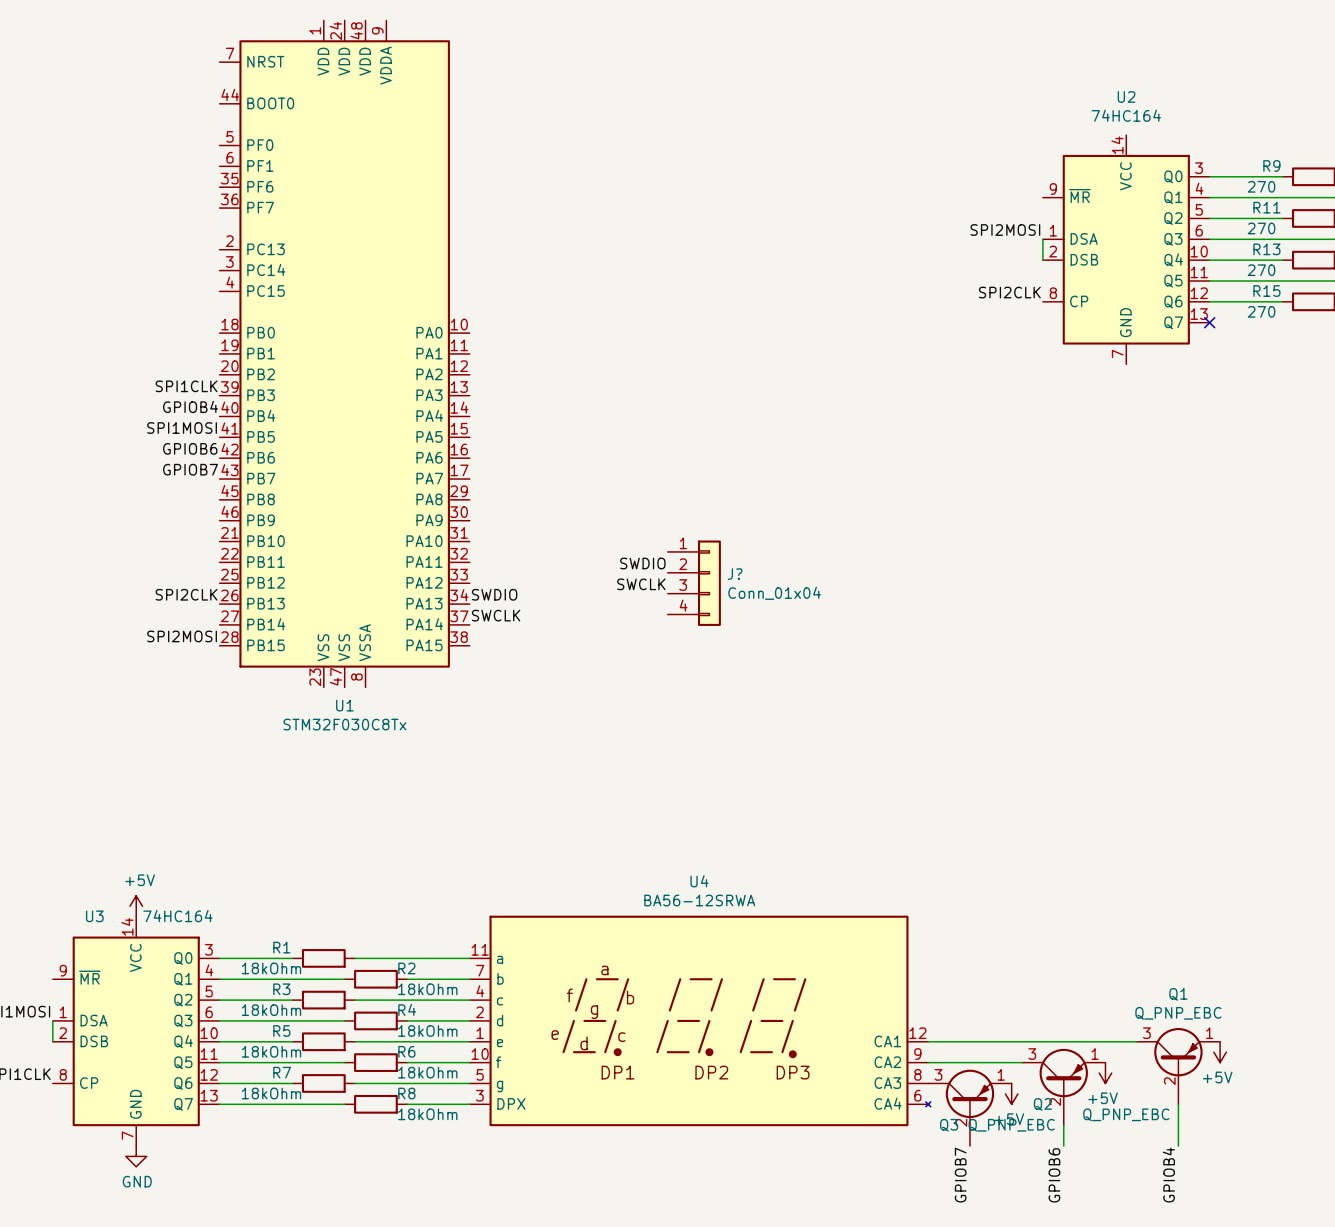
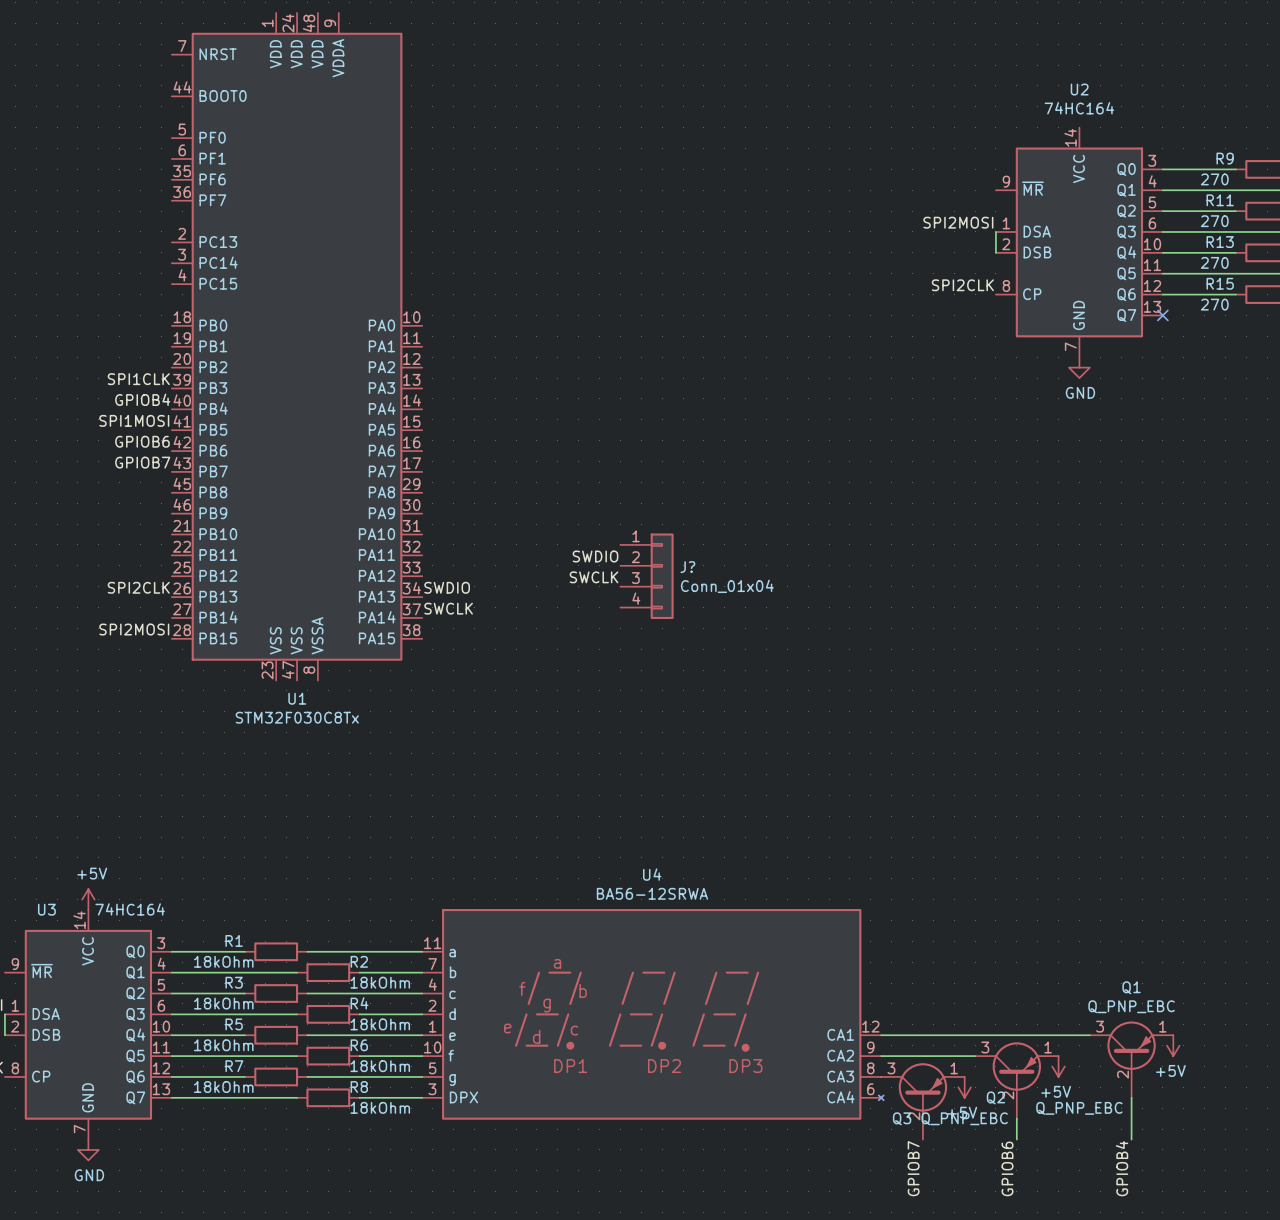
power symbol: none -> GND (1079, 367)

